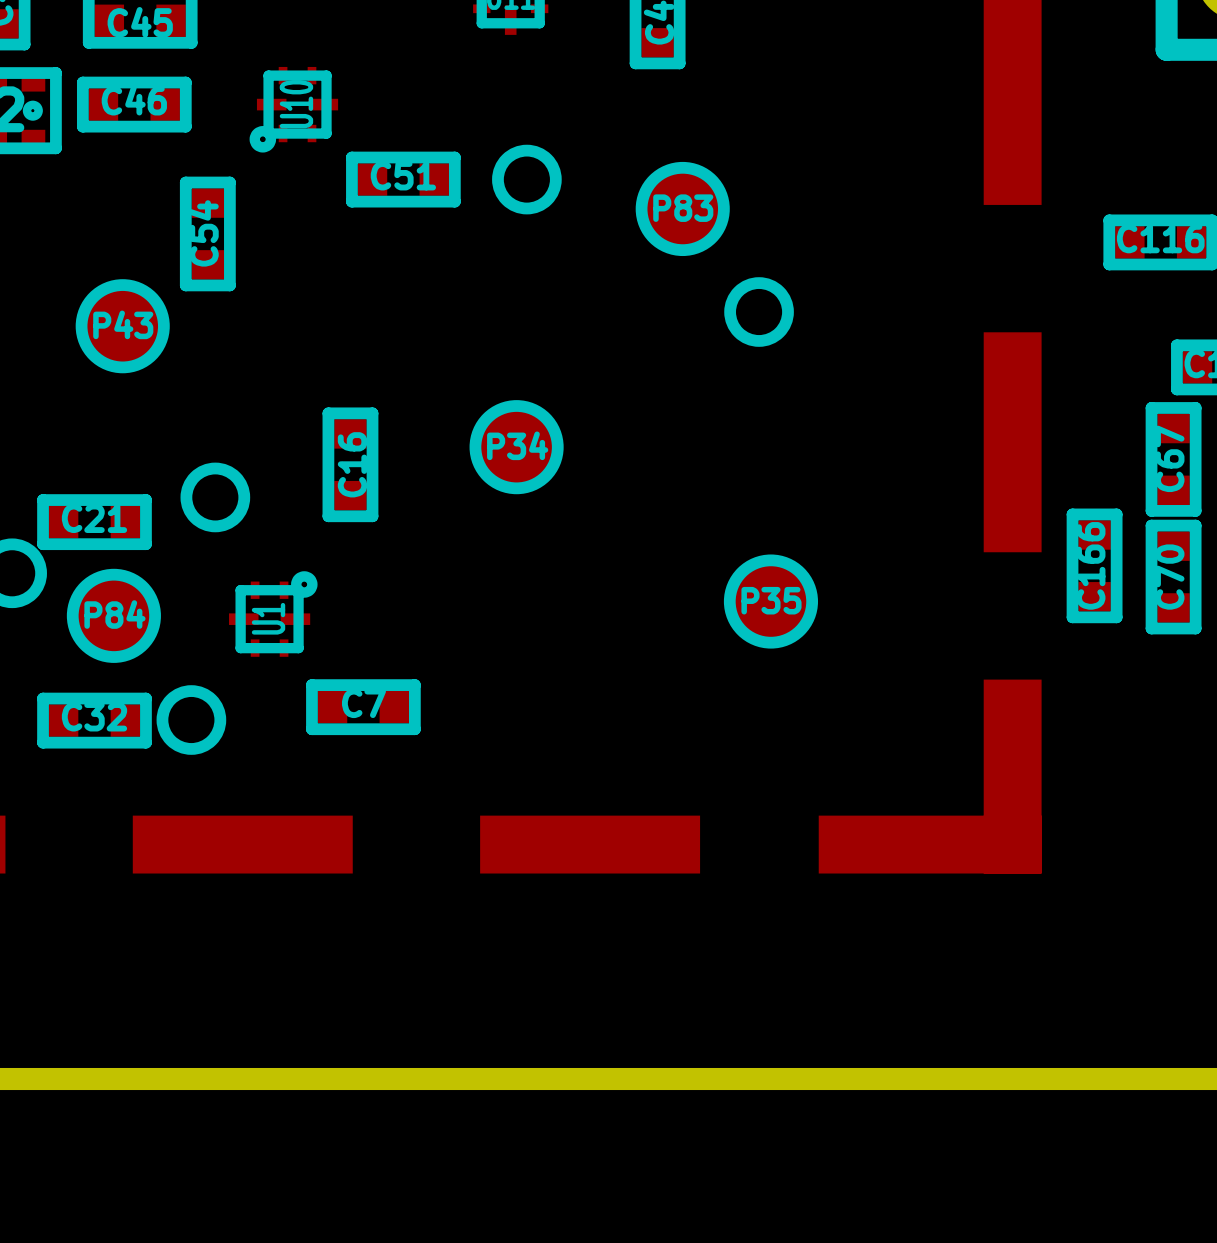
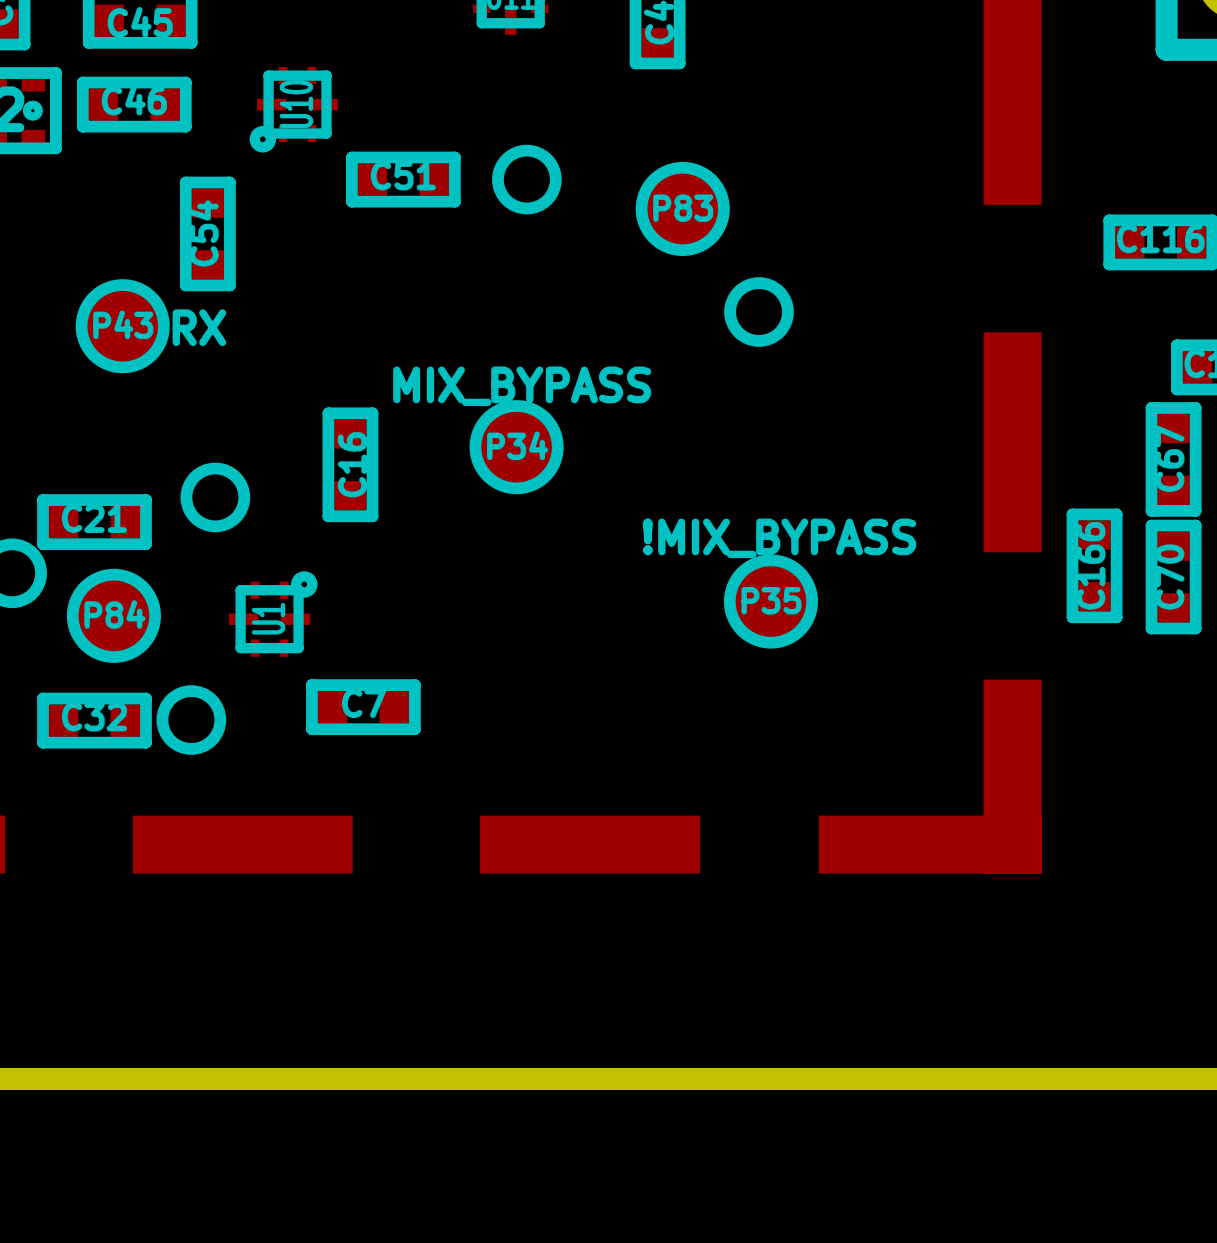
P43 value: none -> RX (199, 327)
P34 value: none -> MIX_BYPASS (522, 386)
P35 value: none -> !MIX_BYPASS (779, 538)

